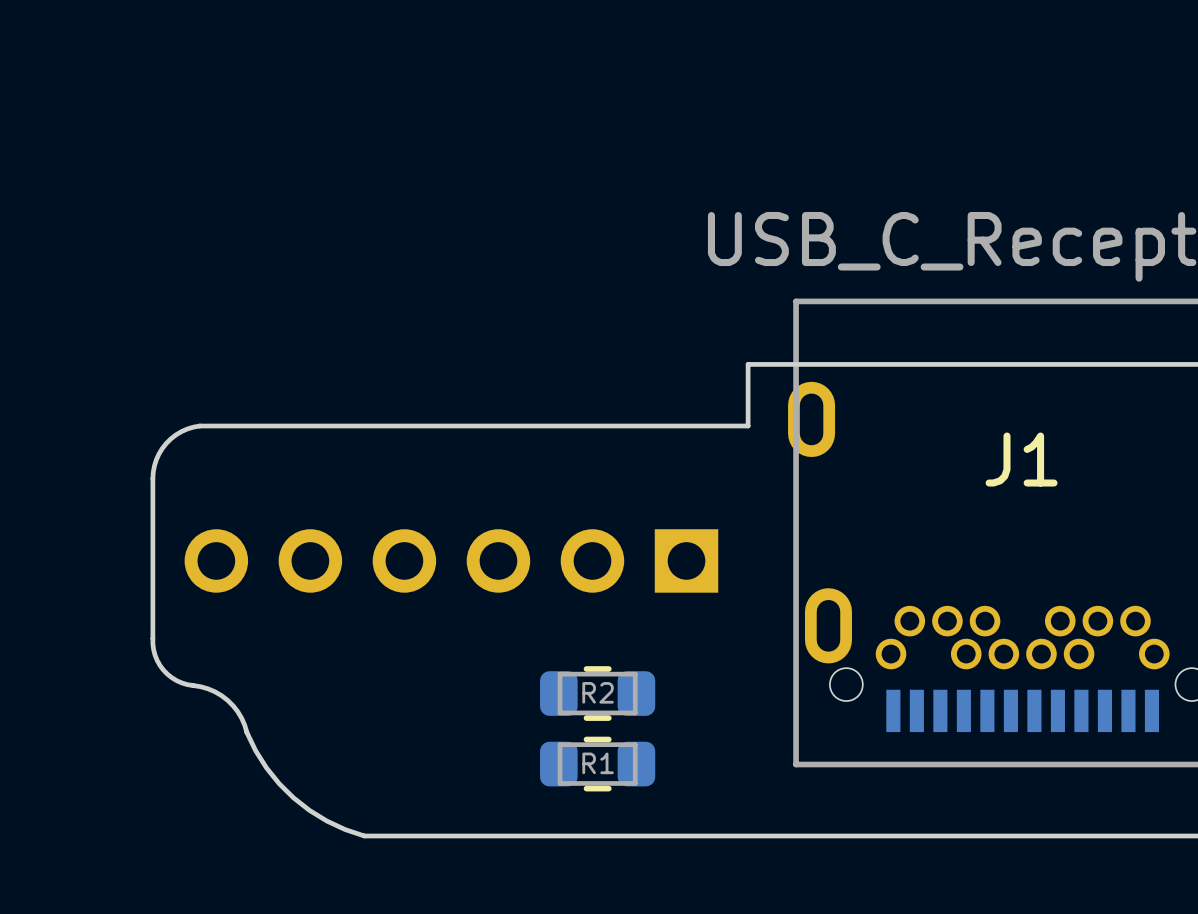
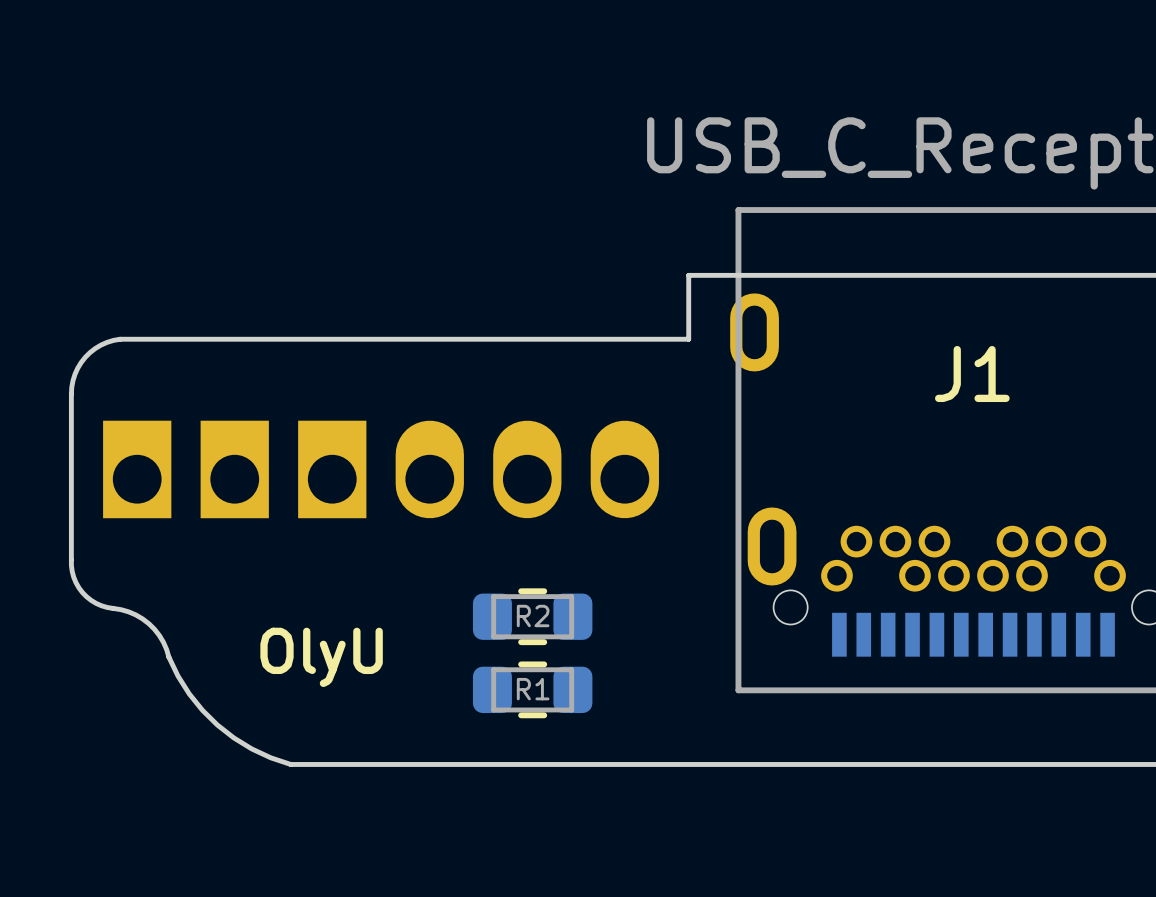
part footprint: [184, 529, 719, 593] -> [103, 420, 659, 519]
text: none -> OlyU (321, 657)

